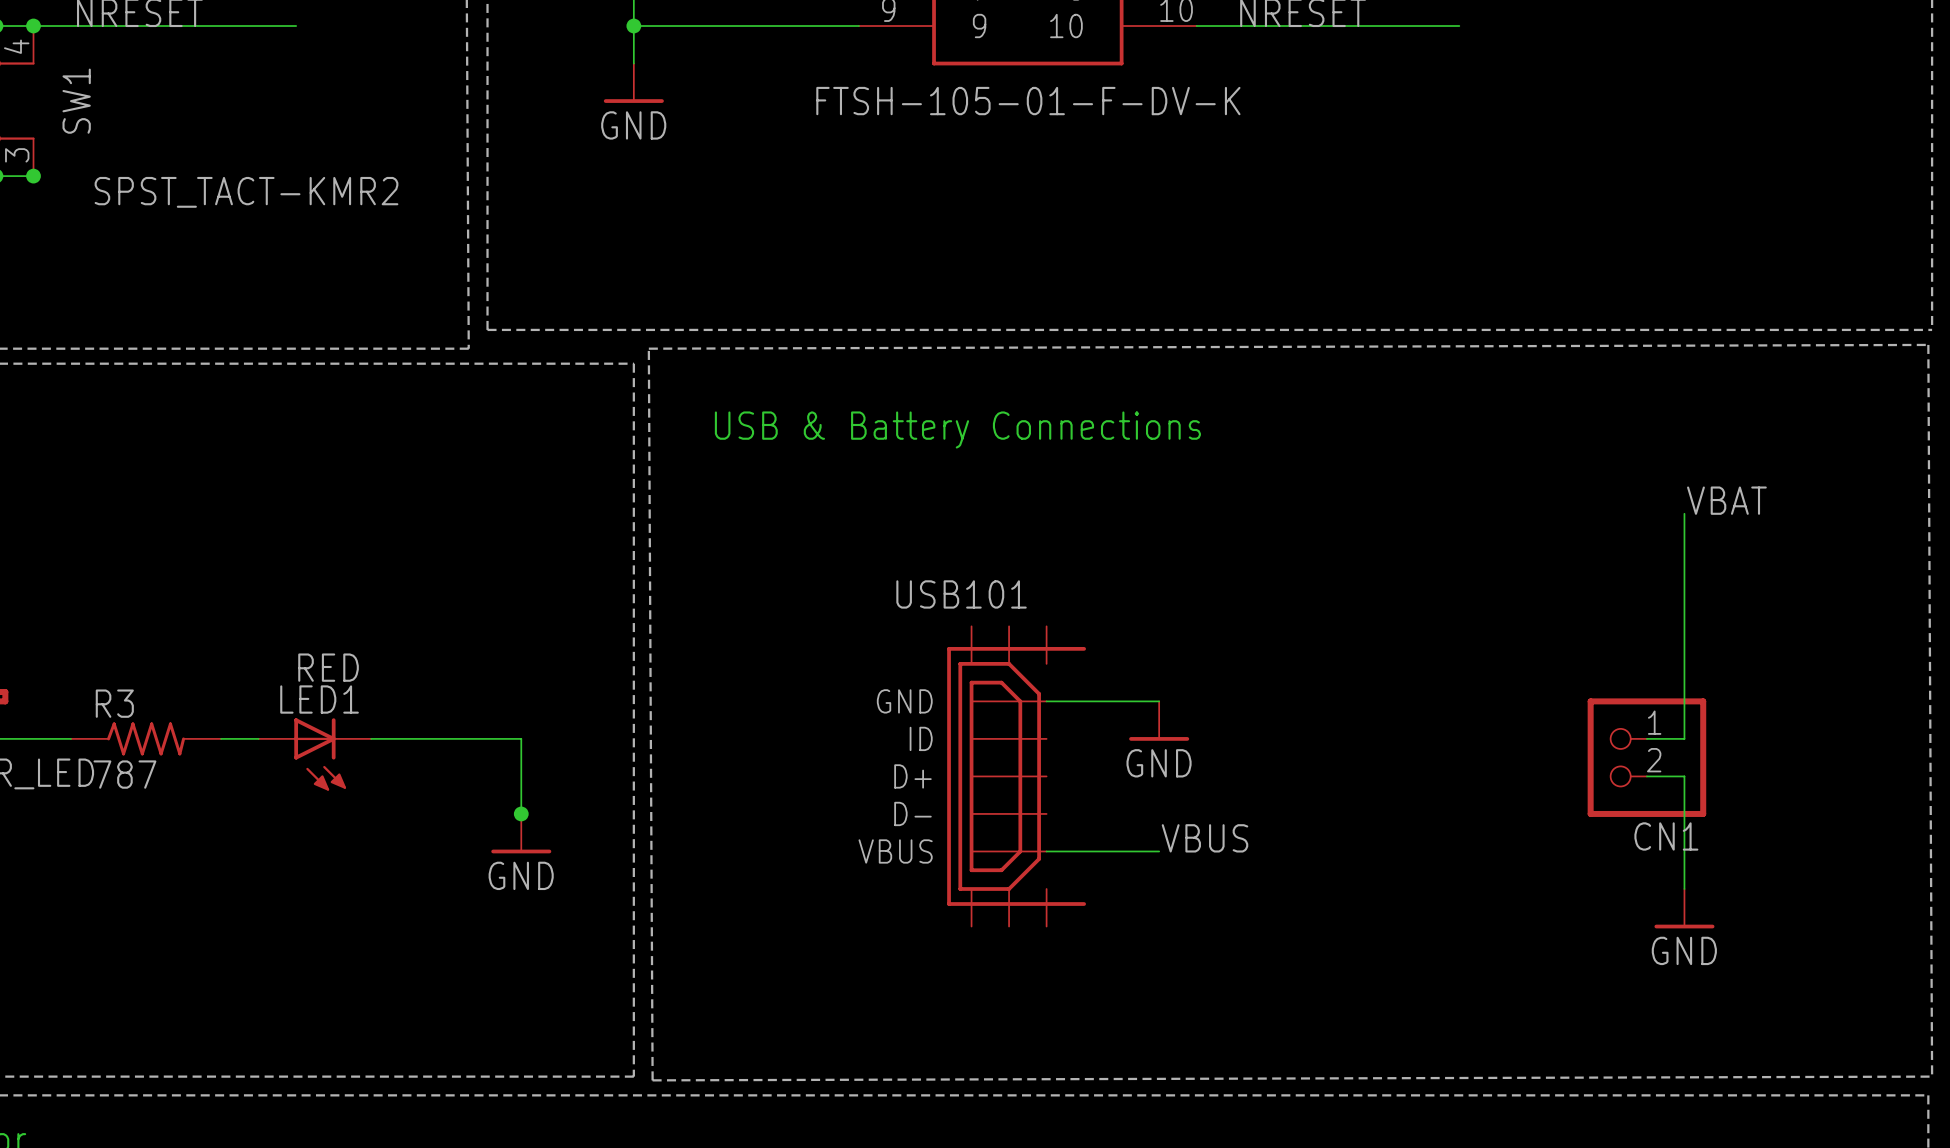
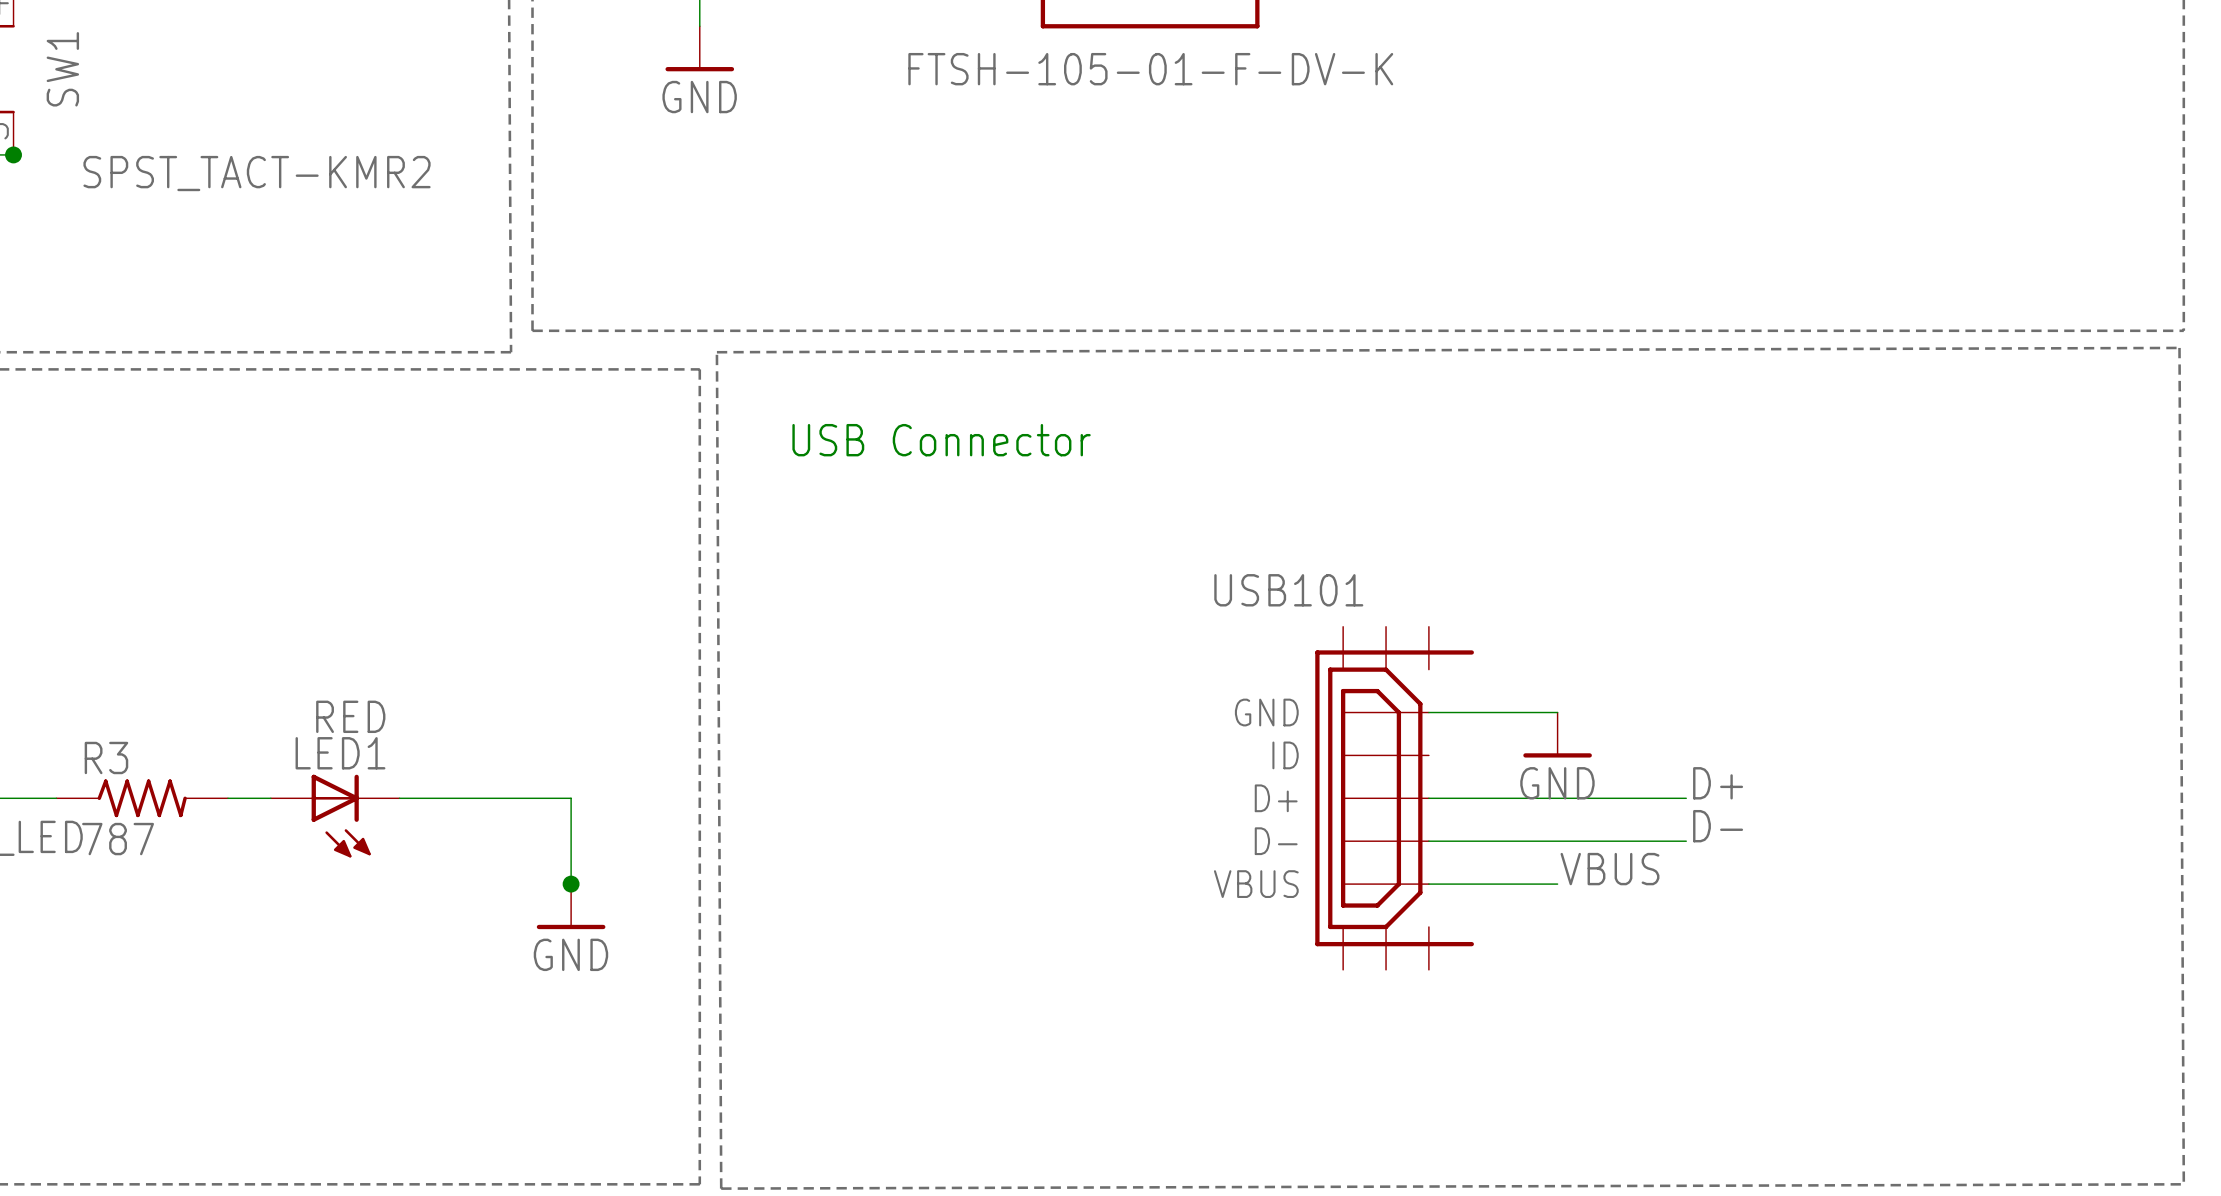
text: USB & Battery Connections (957, 429) -> USB Connector (941, 440)
label: VBAT (1726, 500) -> none
wire: (1684, 513) (1684, 738) (1646, 738) -> none
USB101 name position: USB101 (961, 594) -> USB101 (1288, 590)
power symbol: none -> GND (1557, 735)
wire: (1046, 701) (1159, 701) -> (1428, 712) (1557, 712)
power symbol: GND (1159, 721) -> none
label: none -> D+ (1718, 783)
wire: none -> (1428, 798) (1686, 798)
CN1: (1646, 757) -> none
label: none -> D- (1718, 826)
USB101 position: (1016, 776) -> (1394, 798)
wire: none -> (1428, 841) (1686, 841)
wire: (1646, 776) (1684, 776) (1684, 889) -> none
label position: VBUS (1205, 838) -> VBUS (1609, 869)
wire: (1046, 851) (1159, 851) -> (1428, 884) (1557, 884)
power symbol: GND (1684, 908) -> none

